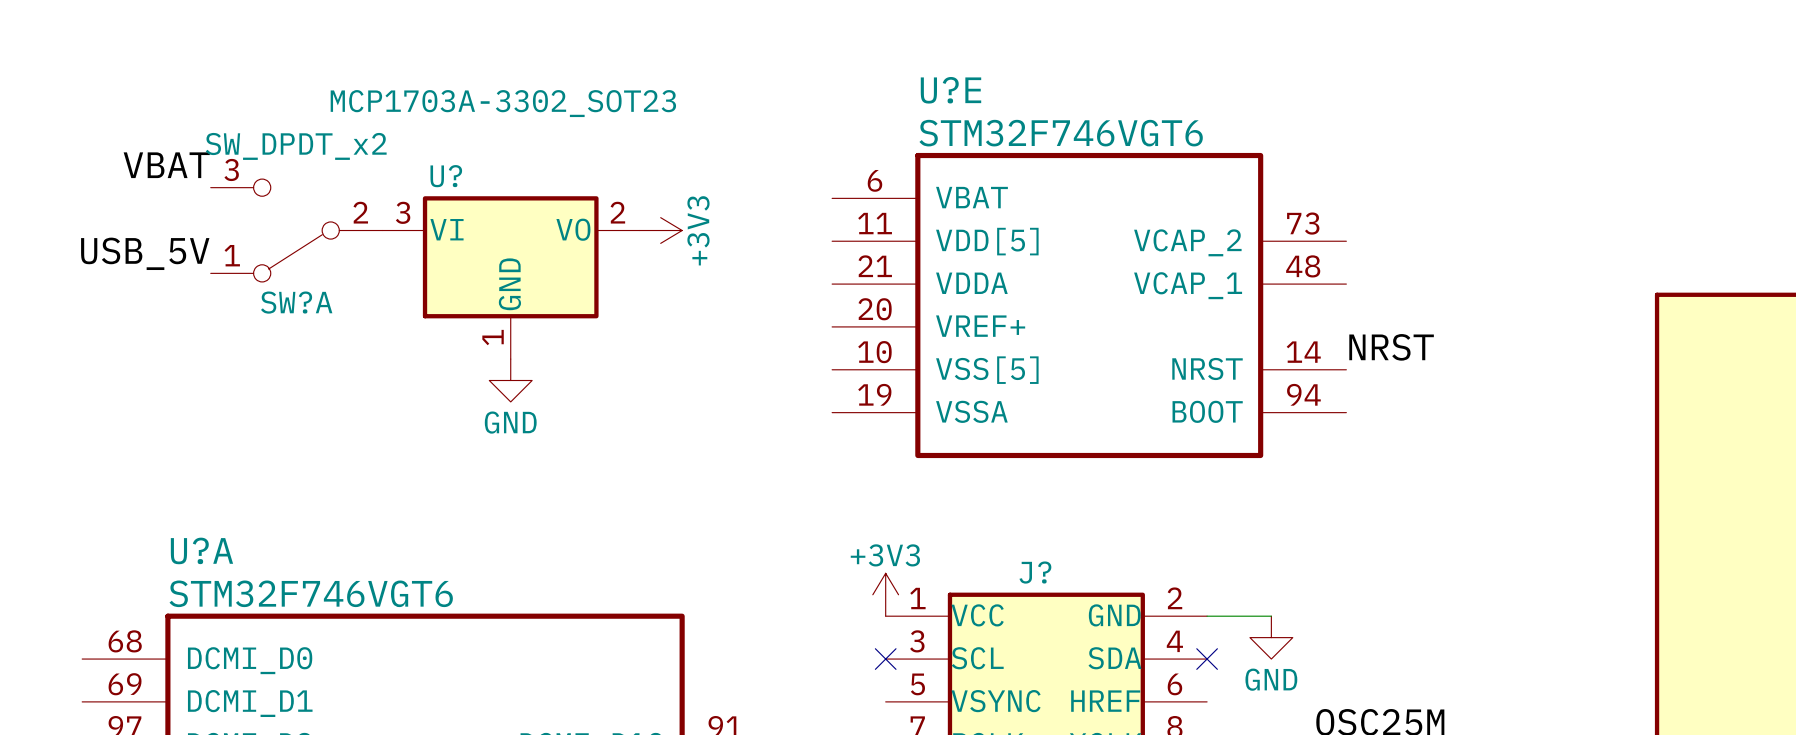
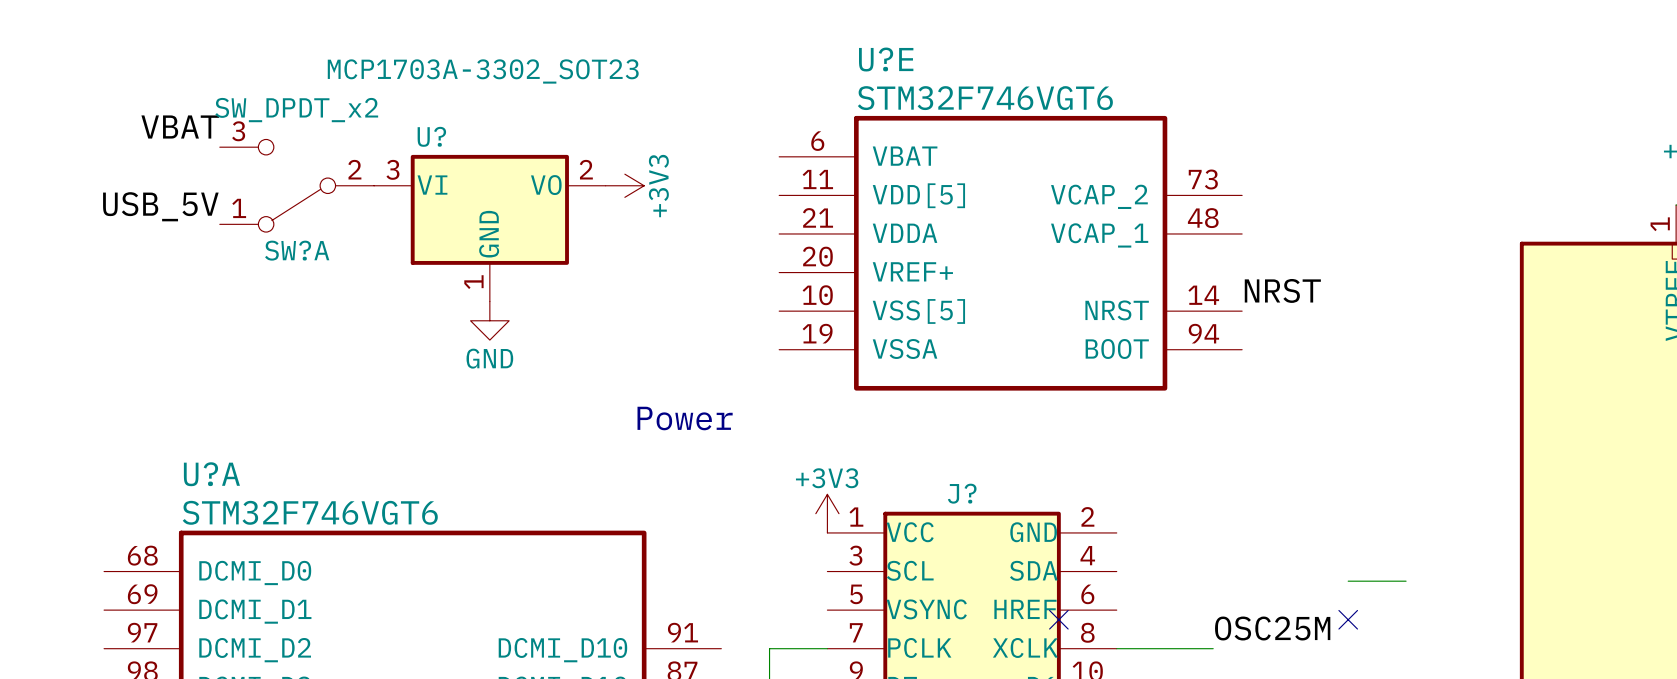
text: none -> Power (685, 418)
wire: (1207, 616) (1271, 616) -> (1348, 581) (1406, 581)
power symbol: GND (1271, 637) -> none
no-connect mark: (885, 659) -> none
no-connect mark position: (1207, 659) -> (1058, 619)
no-connect mark: none -> (1348, 619)

